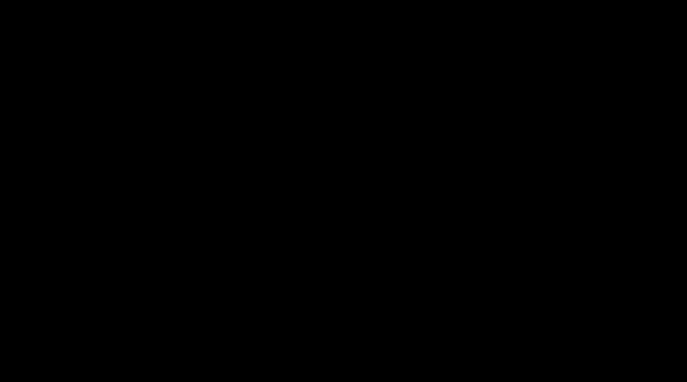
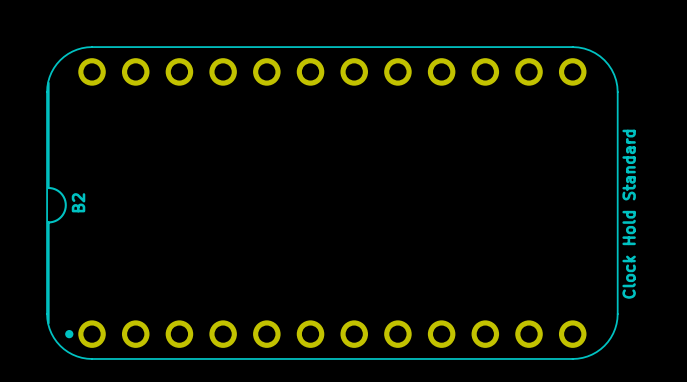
B2: none -> (332, 203)

